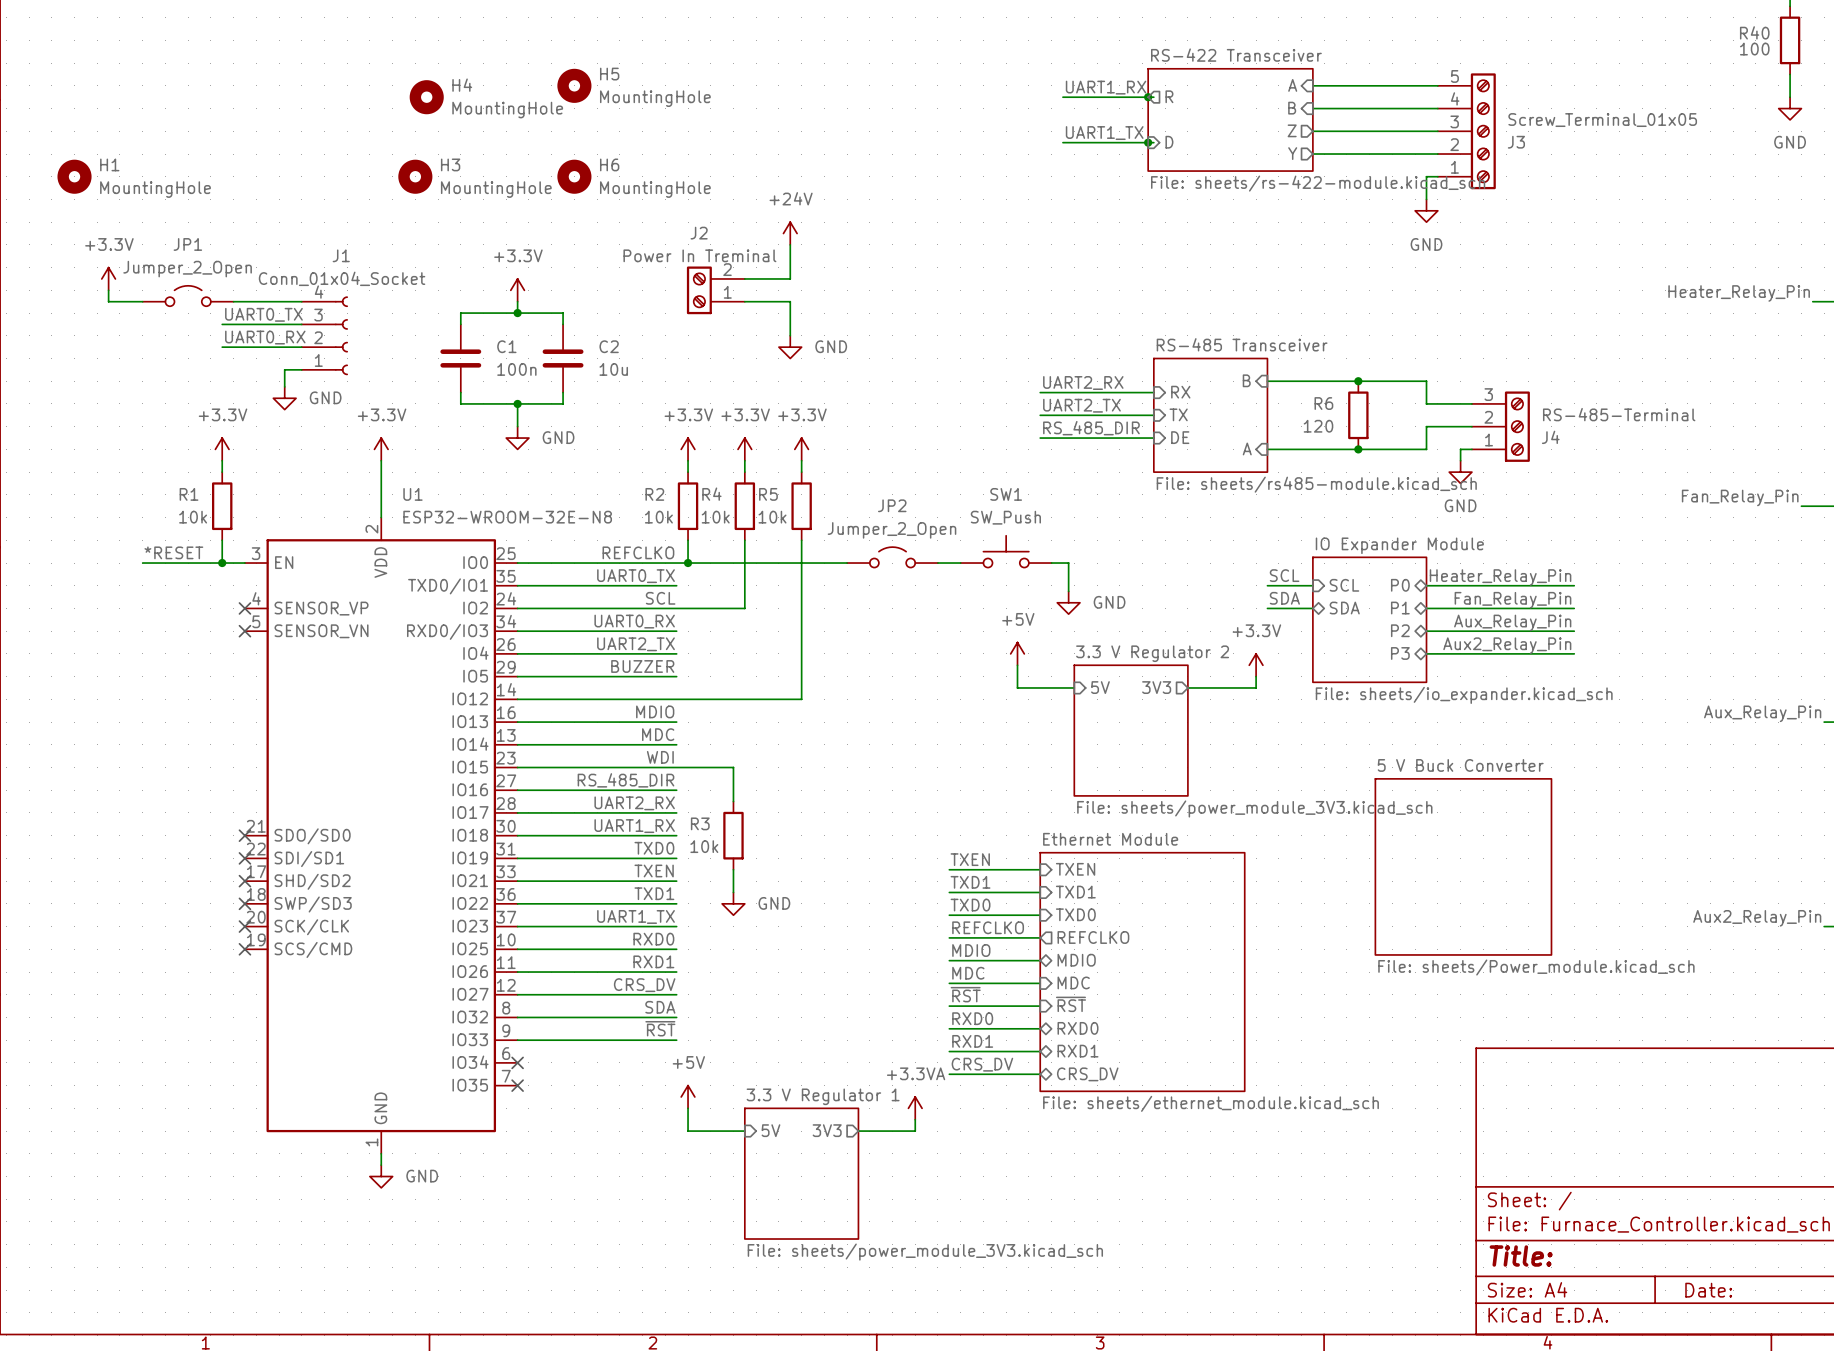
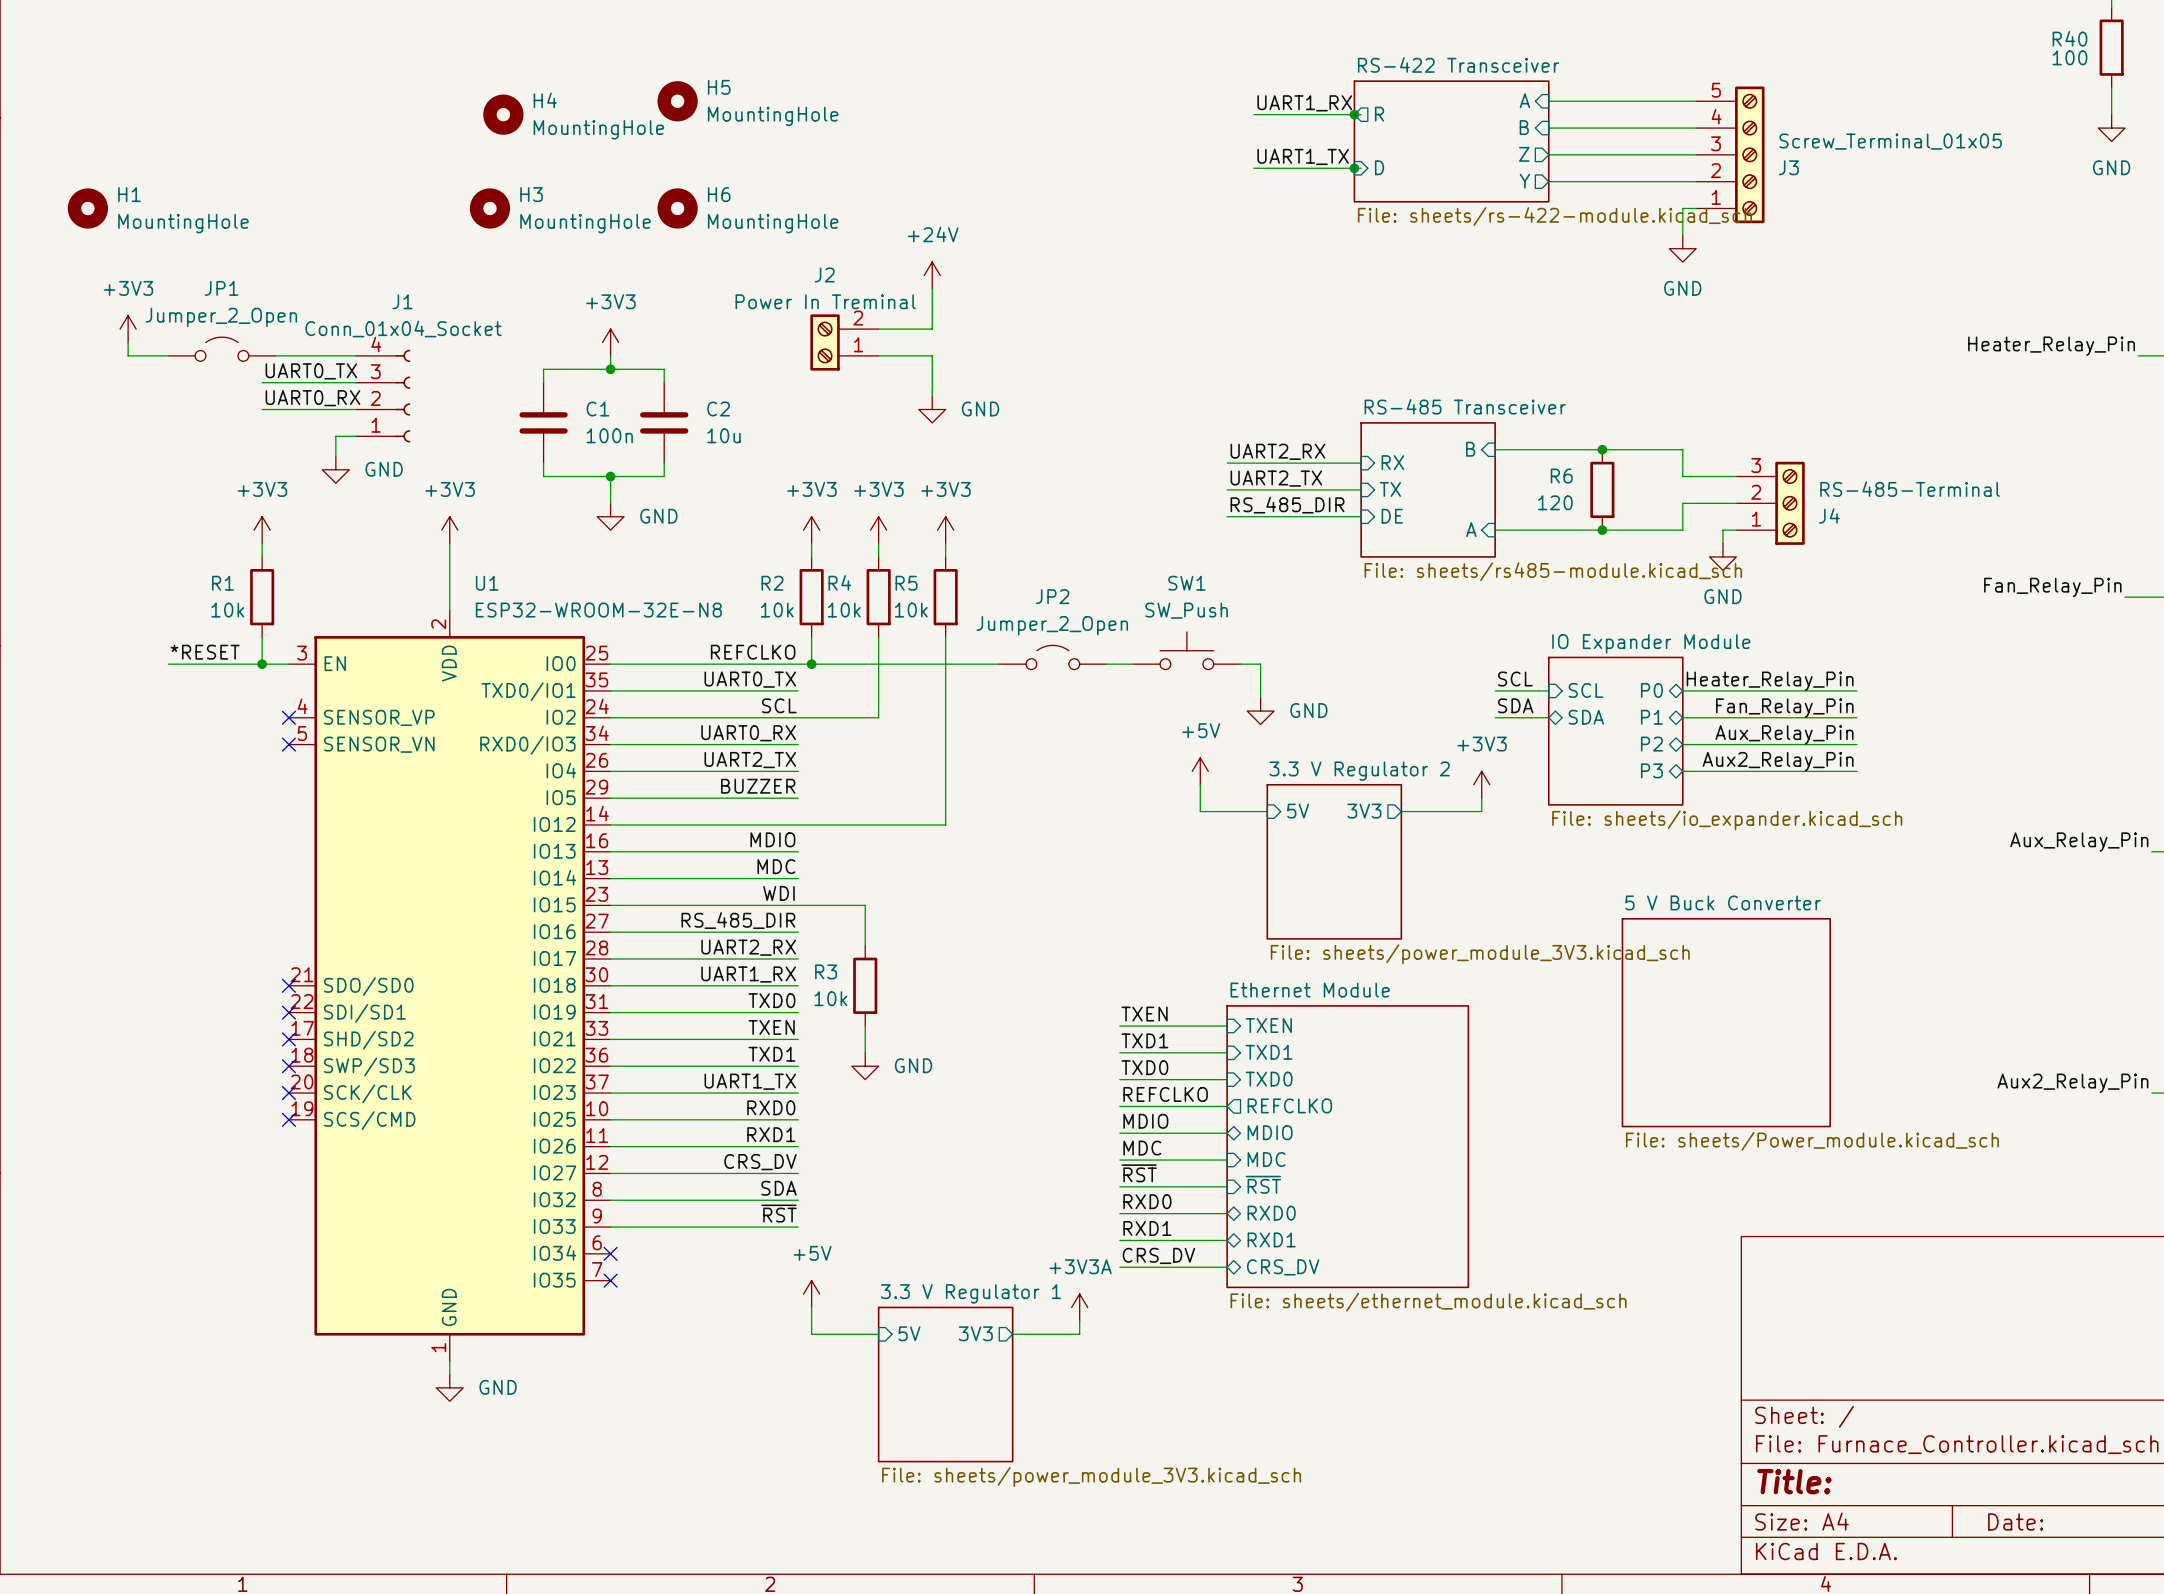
power symbol: +3.3V (108, 278) -> +3V3 (128, 329)
power symbol: +3.3V (517, 290) -> +3V3 (610, 342)
power symbol: +3.3V (222, 449) -> +3V3 (262, 530)
power symbol: +3.3V (381, 449) -> +3V3 (449, 530)
power symbol: +3.3V (688, 449) -> +3V3 (811, 530)
power symbol: +3.3V (744, 449) -> +3V3 (878, 530)
power symbol: +3.3V (801, 449) -> +3V3 (945, 530)
power symbol: +3.3V (1256, 665) -> +3V3 (1481, 784)
power symbol: +3.3VA (915, 1108) -> +3V3A (1079, 1307)

